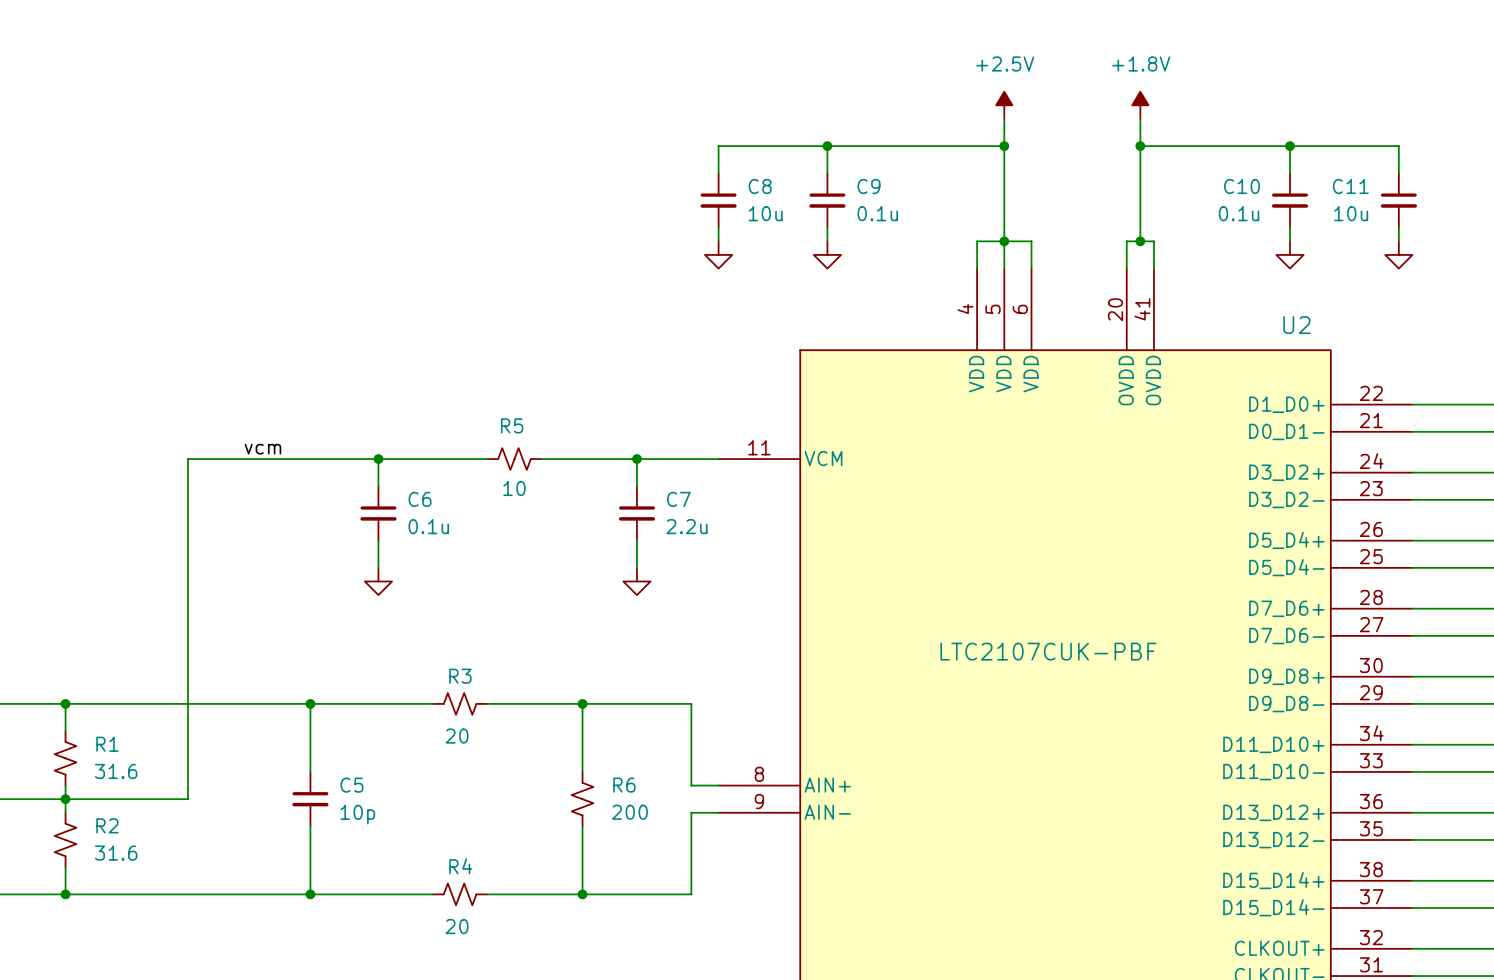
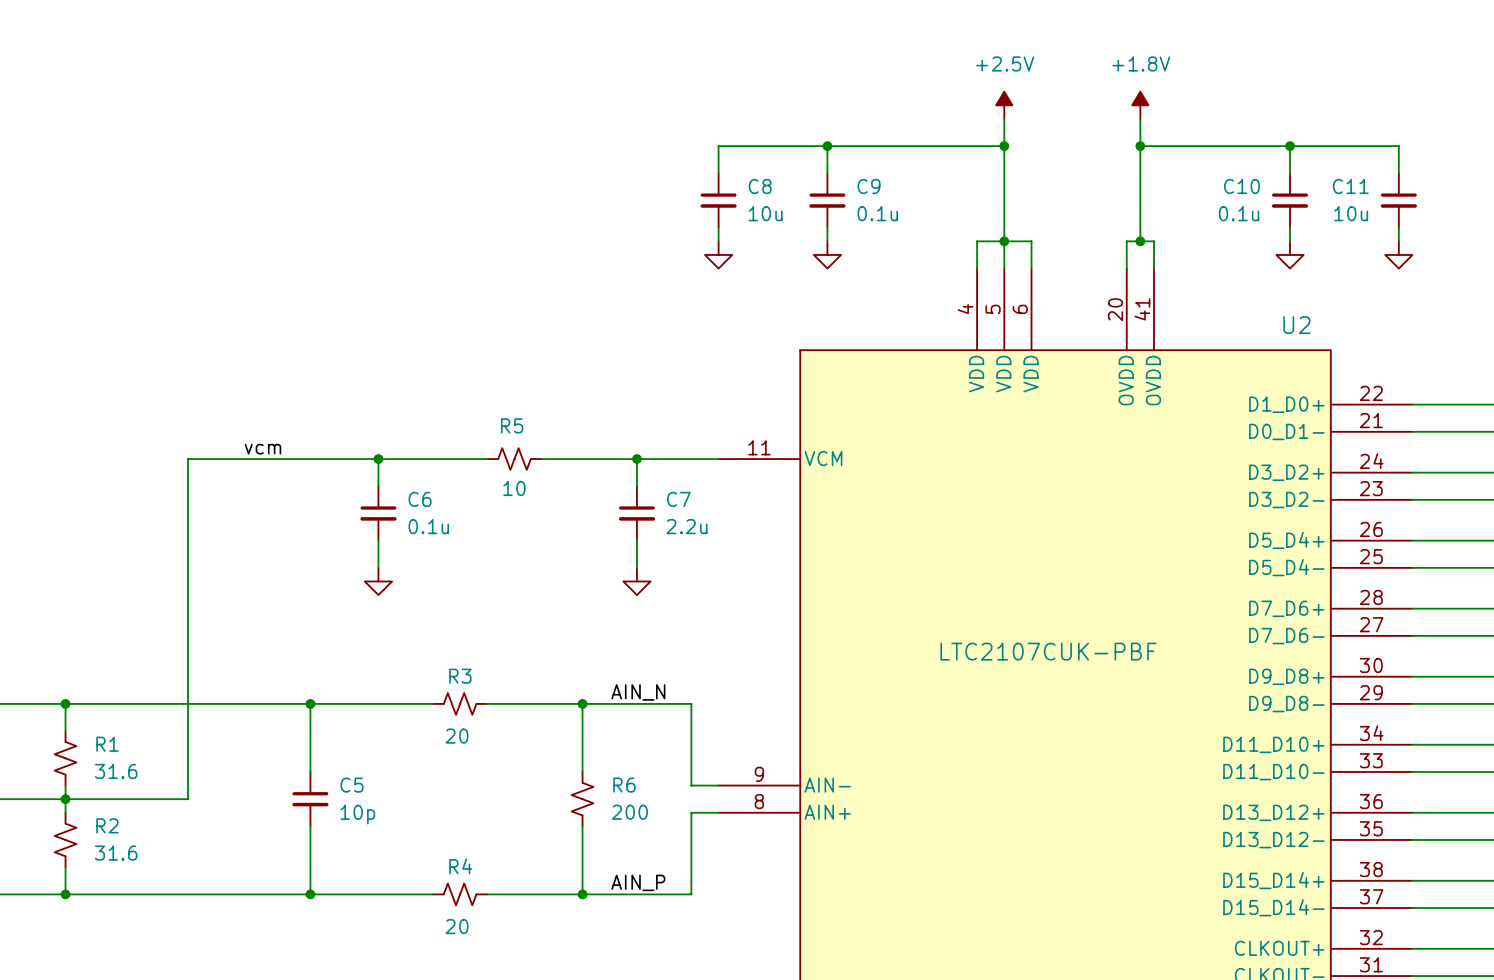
label: none -> AIN_N (638, 692)
U2 pin number: 8 (759, 774) -> 9 (759, 774)
U2 pin name: AIN+ (827, 785) -> AIN- (827, 785)
U2 pin number: 9 (759, 801) -> 8 (759, 801)
U2 pin name: AIN- (827, 812) -> AIN+ (827, 812)
label: none -> AIN_P (638, 882)

